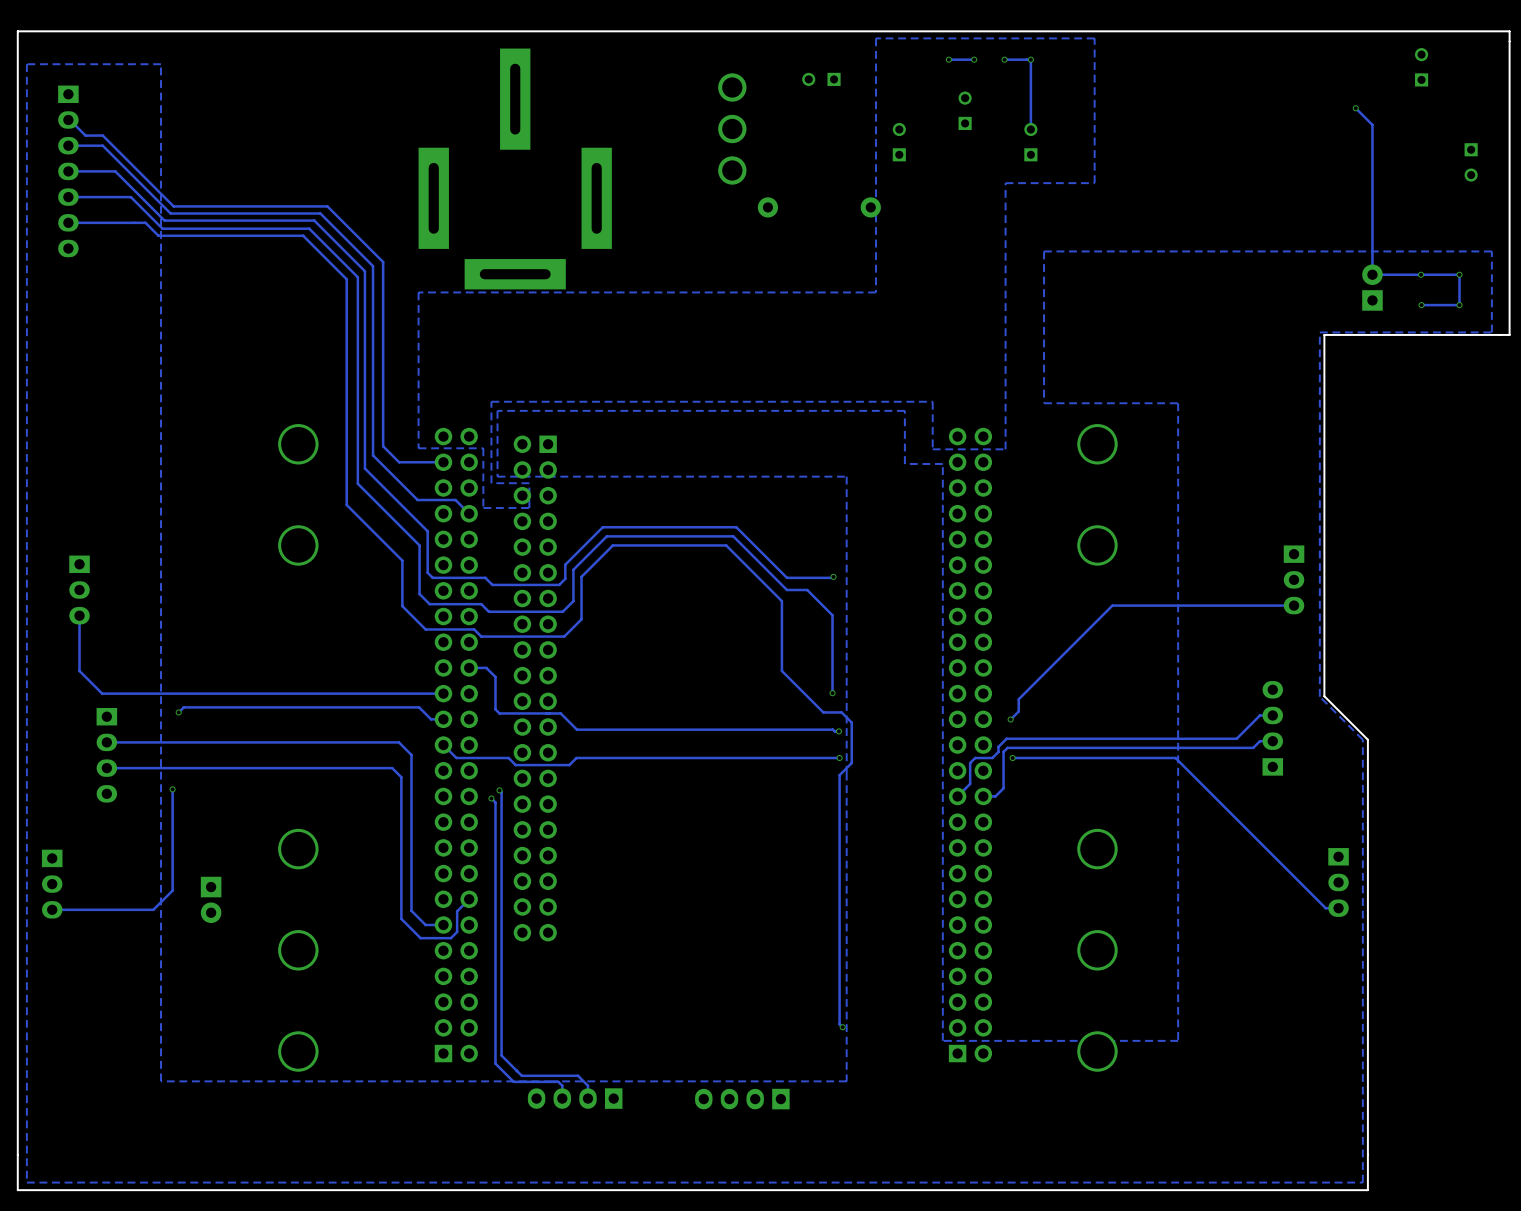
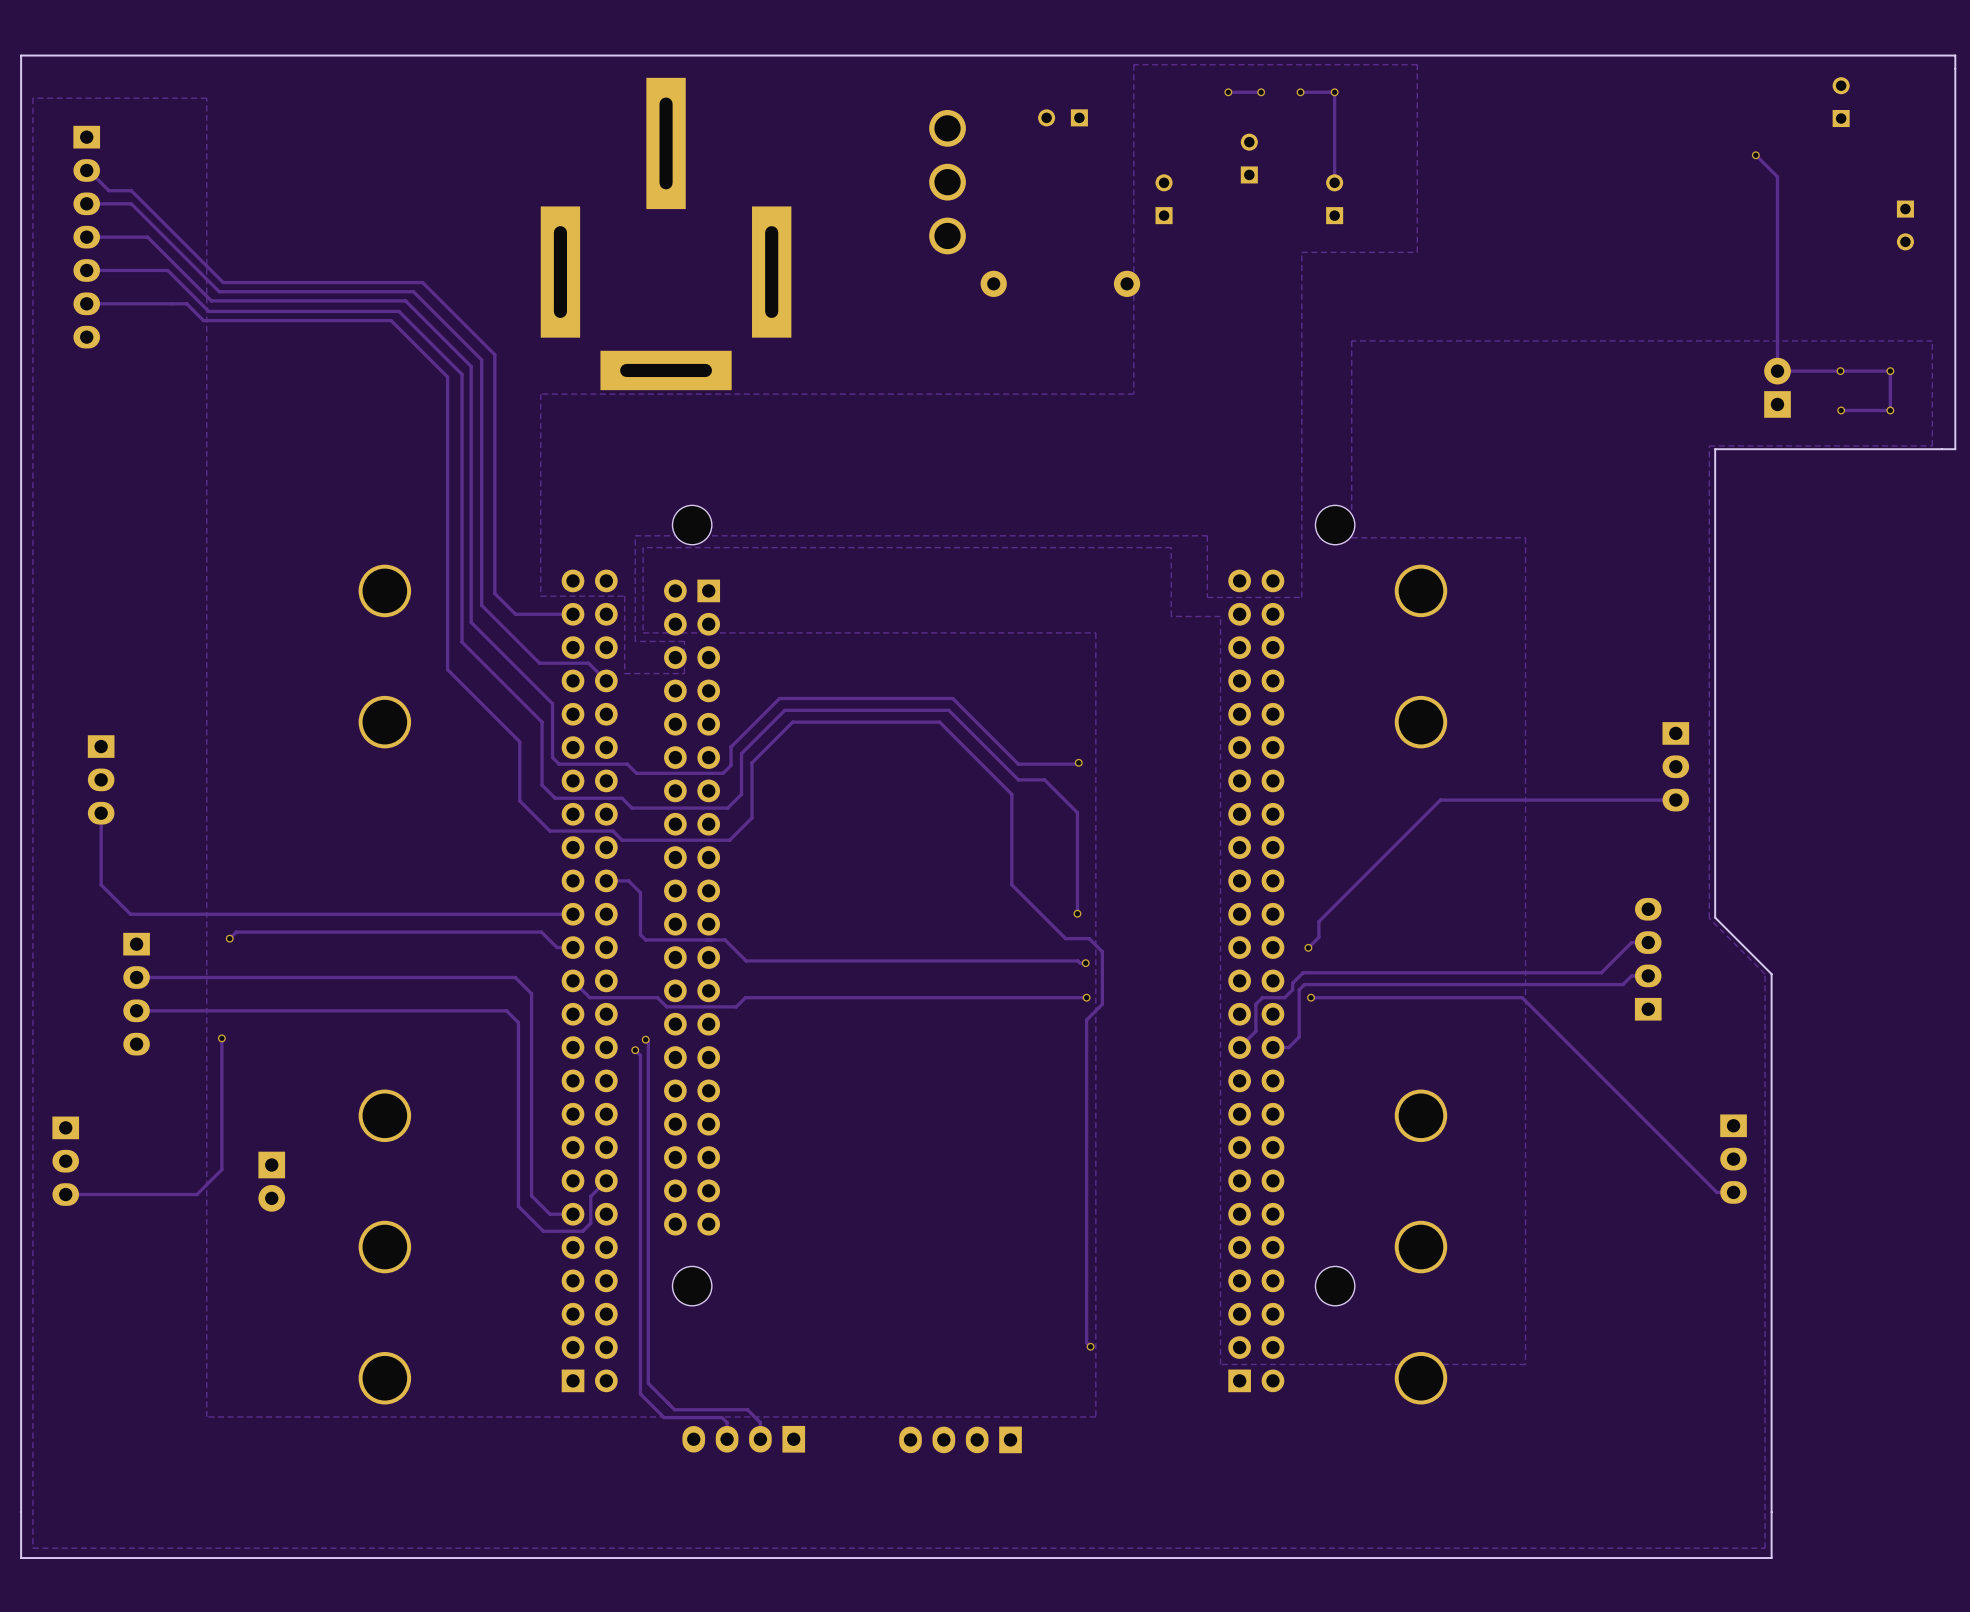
part: none -> (692, 525)
part: none -> (1335, 525)
part: none -> (692, 1286)
part: none -> (1335, 1286)

